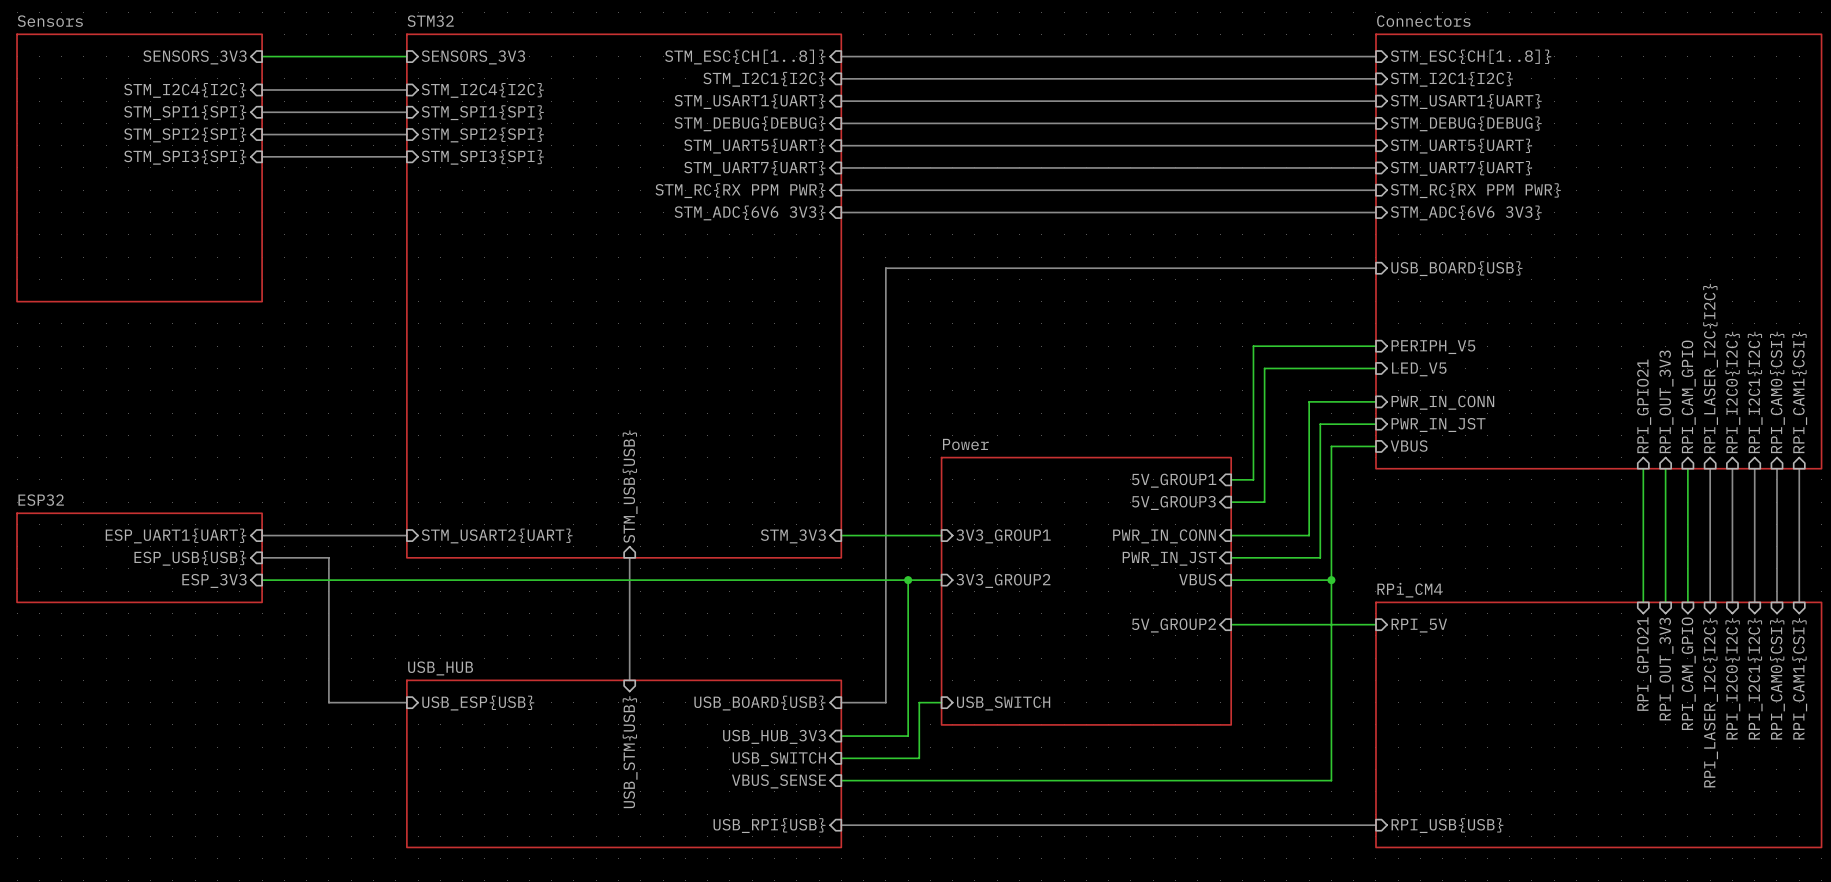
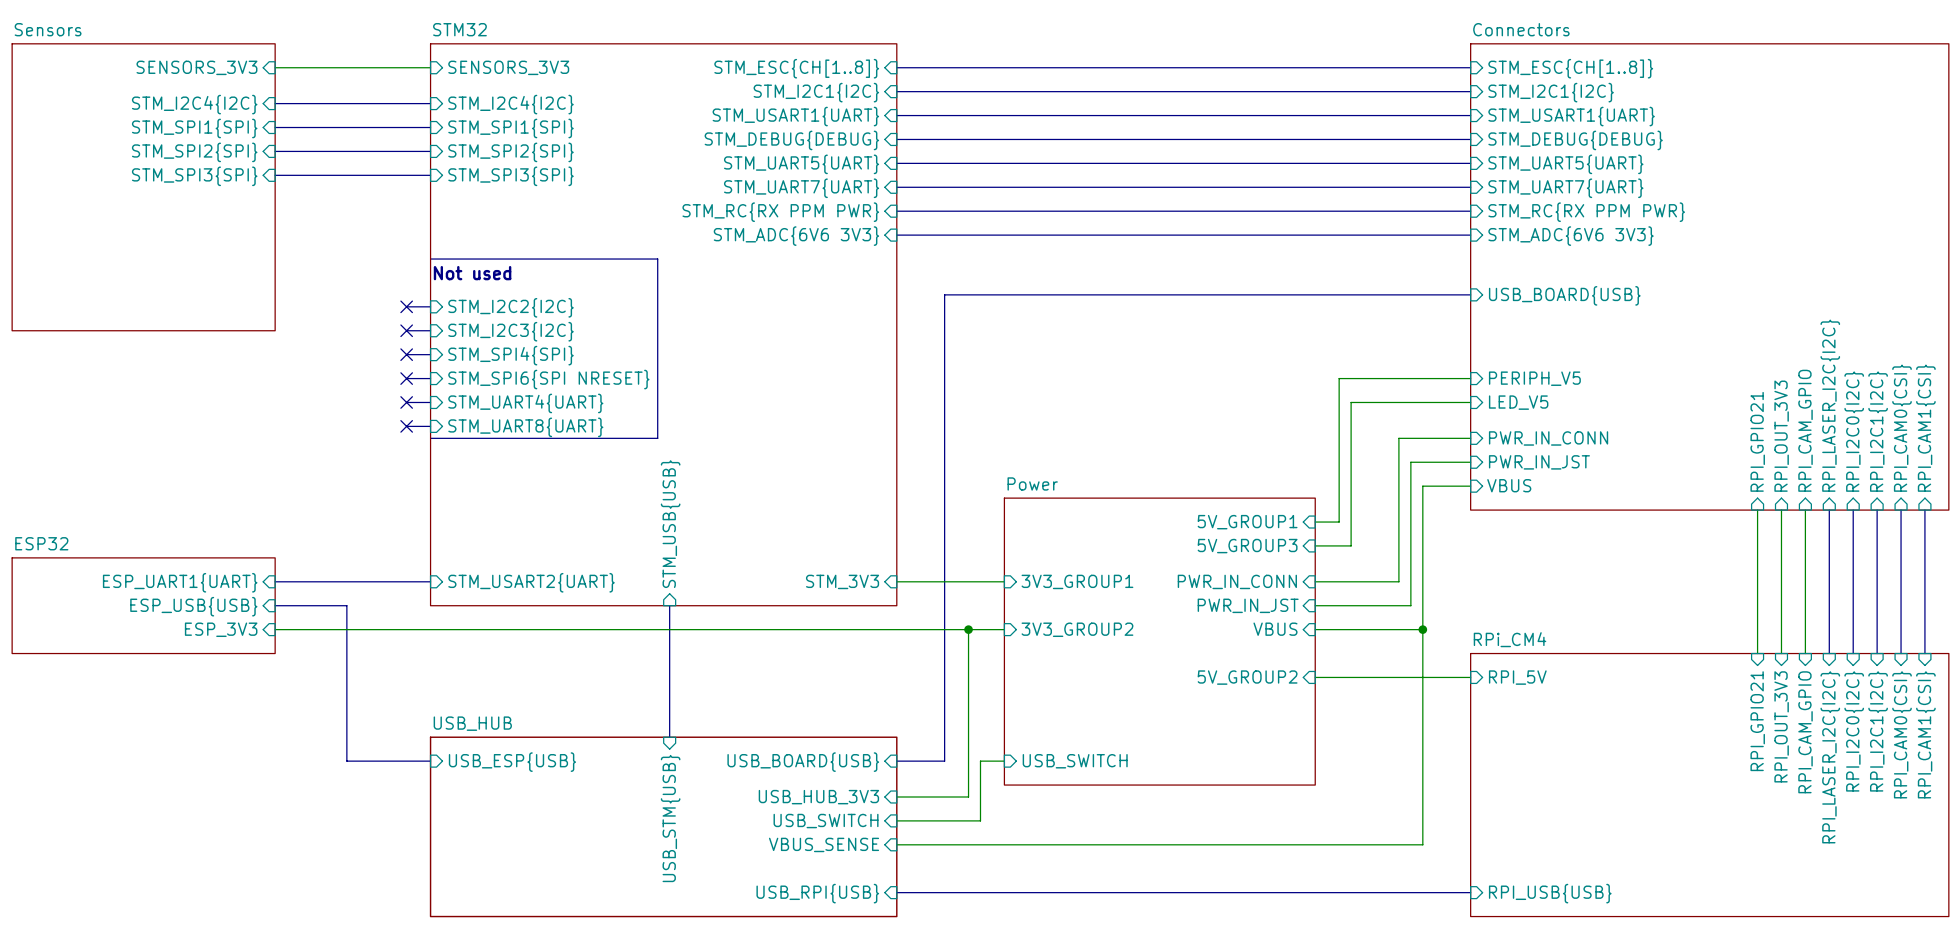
line: none -> (430, 259) (657, 259) (657, 438) (430, 438)
text: none -> Not used (472, 273)
bus: none -> (406, 306) (430, 306)
no-connect mark: none -> (406, 306)
sheet pin: none -> STM_I2C2{I2C} (511, 307)
bus: none -> (406, 330) (430, 330)
no-connect mark: none -> (406, 330)
sheet pin: none -> STM_I2C3{I2C} (511, 331)
bus: none -> (406, 354) (430, 354)
no-connect mark: none -> (406, 354)
sheet pin: none -> STM_SPI4{SPI} (511, 355)
bus: none -> (406, 378) (430, 378)
no-connect mark: none -> (406, 378)
sheet pin: none -> STM_SPI6{SPI NRESET} (548, 379)
bus: none -> (406, 402) (430, 402)
no-connect mark: none -> (406, 402)
sheet pin: none -> STM_UART4{UART} (525, 403)
bus: none -> (406, 426) (430, 426)
no-connect mark: none -> (406, 426)
sheet pin: none -> STM_UART8{UART} (525, 427)

